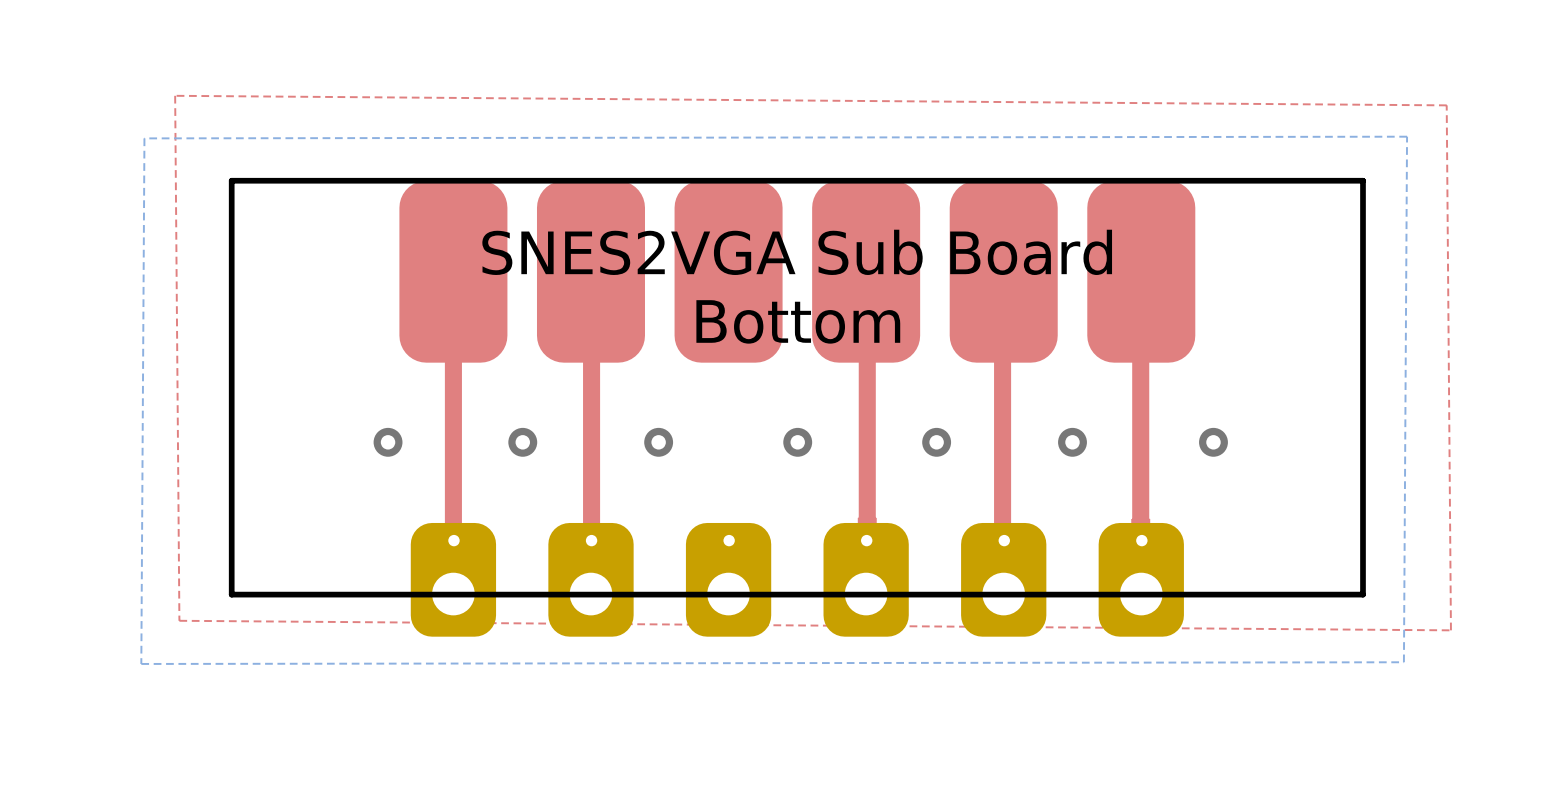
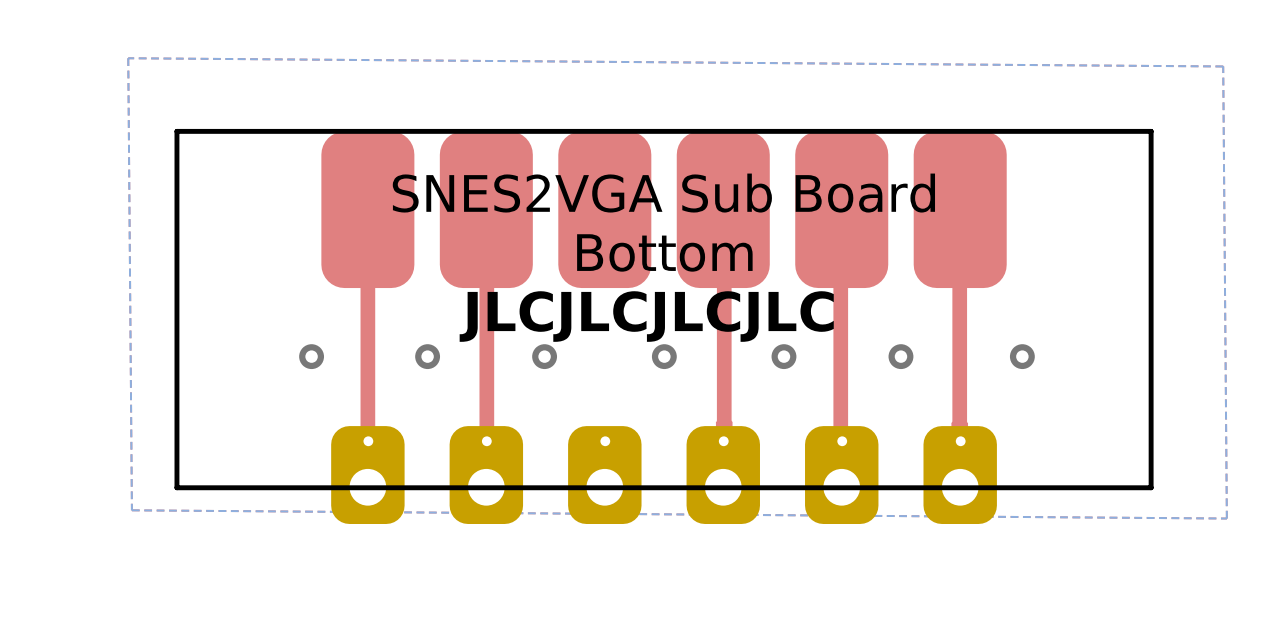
bottom zone outline: (1407, 136) (1403, 662) (141, 663) (144, 138) (1407, 136) -> (128, 58) (1223, 66) (1226, 518) (131, 510) (128, 58)
text: none -> JLCJLCJLCJLC (646, 316)

